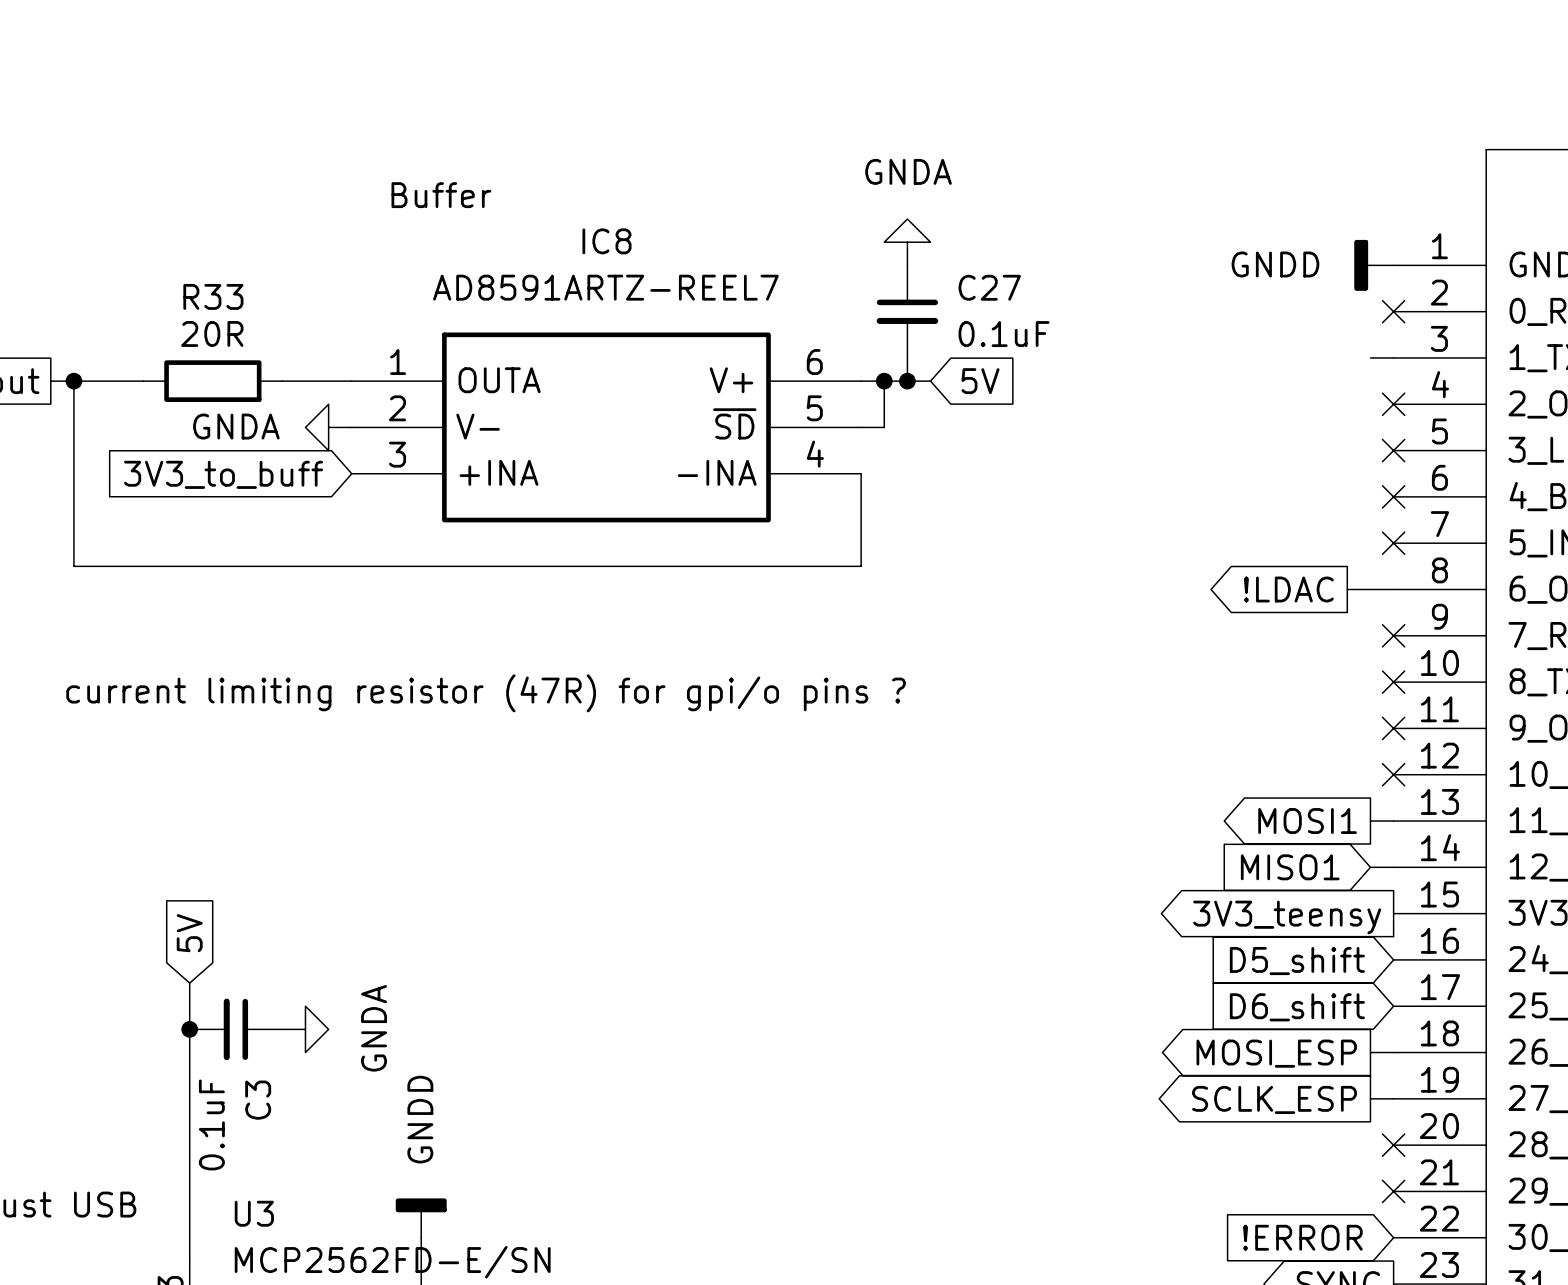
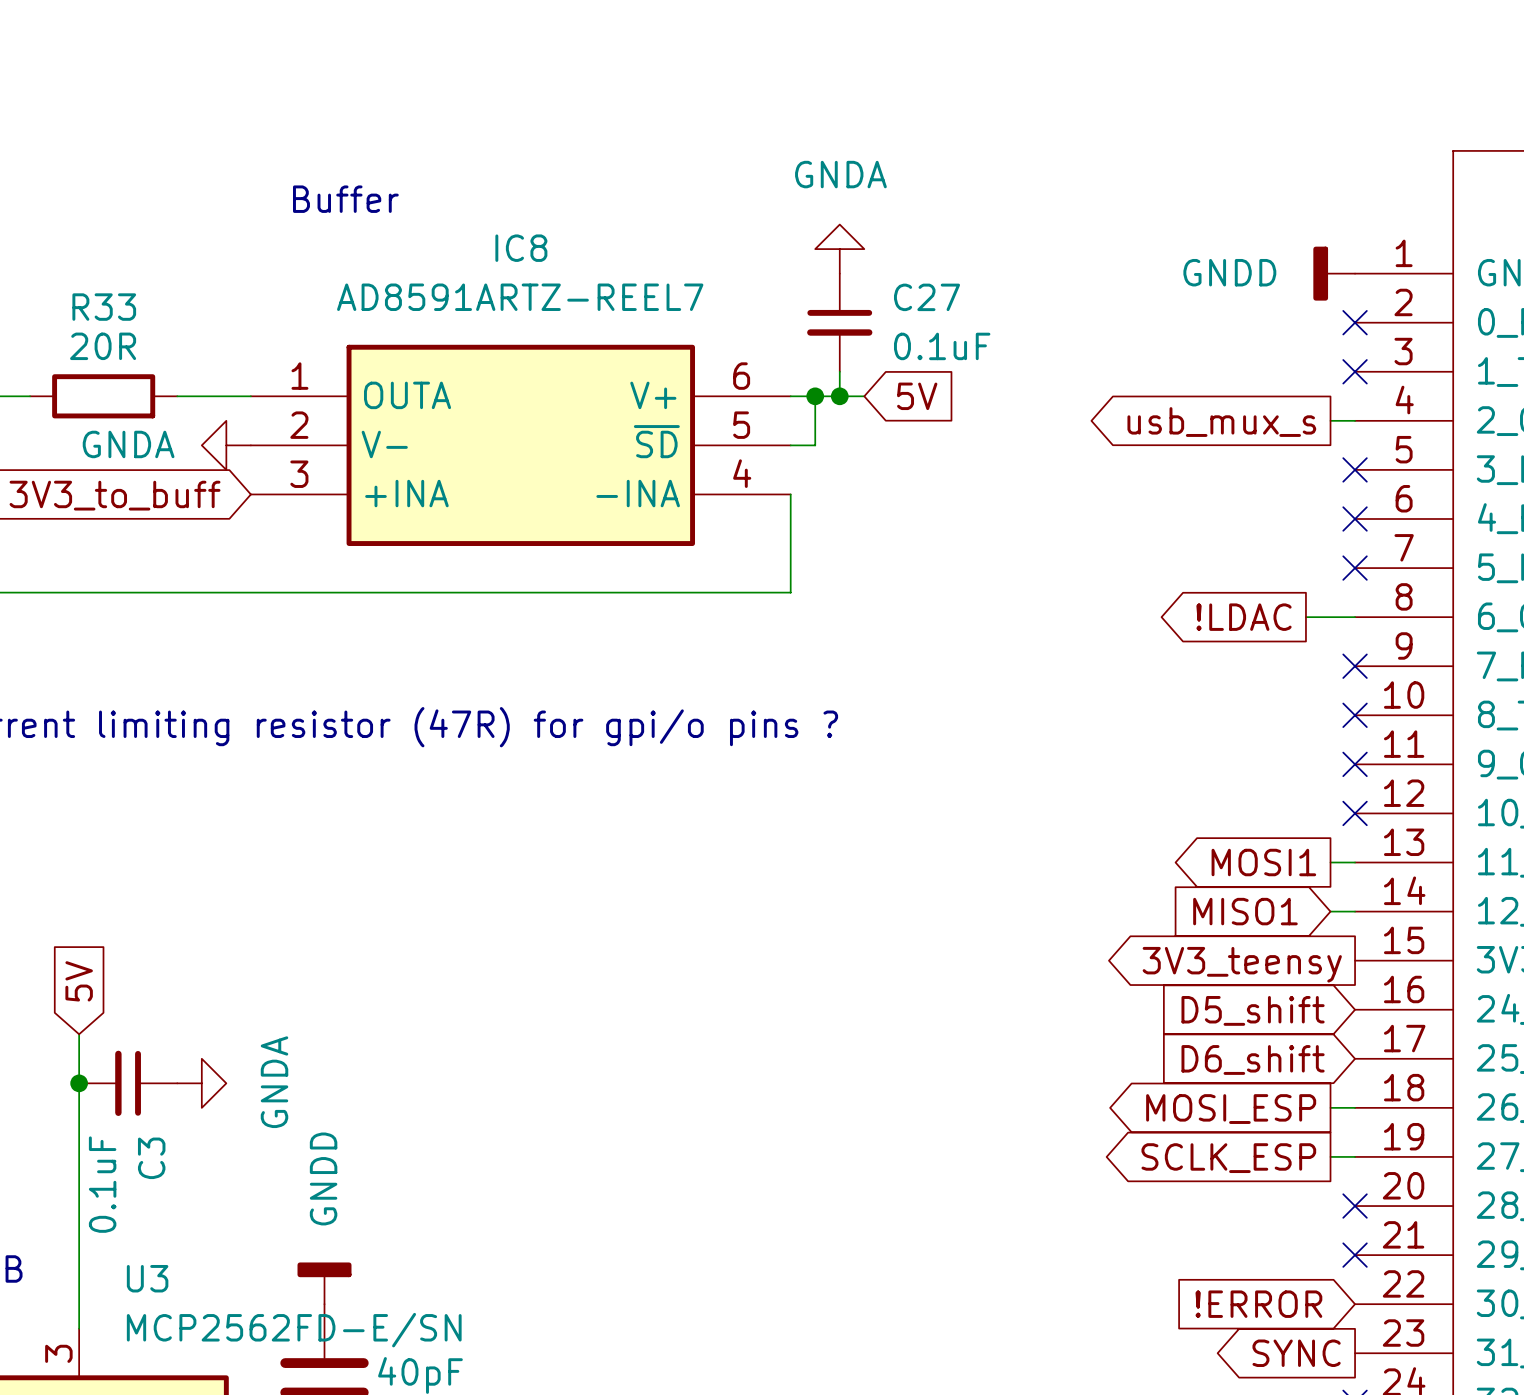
wire: (1370, 357) (1393, 357) -> (1330, 420) (1355, 420)
no-connect mark position: (1393, 404) -> (1355, 371)
global label: none -> usb_mux_s (1221, 422)

